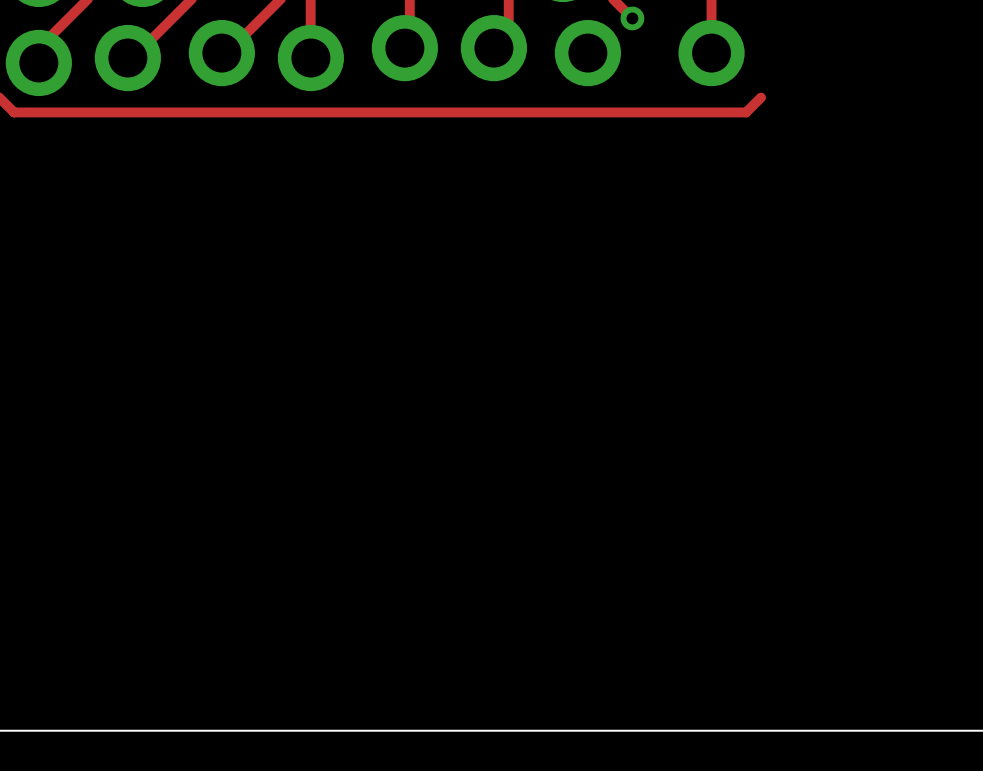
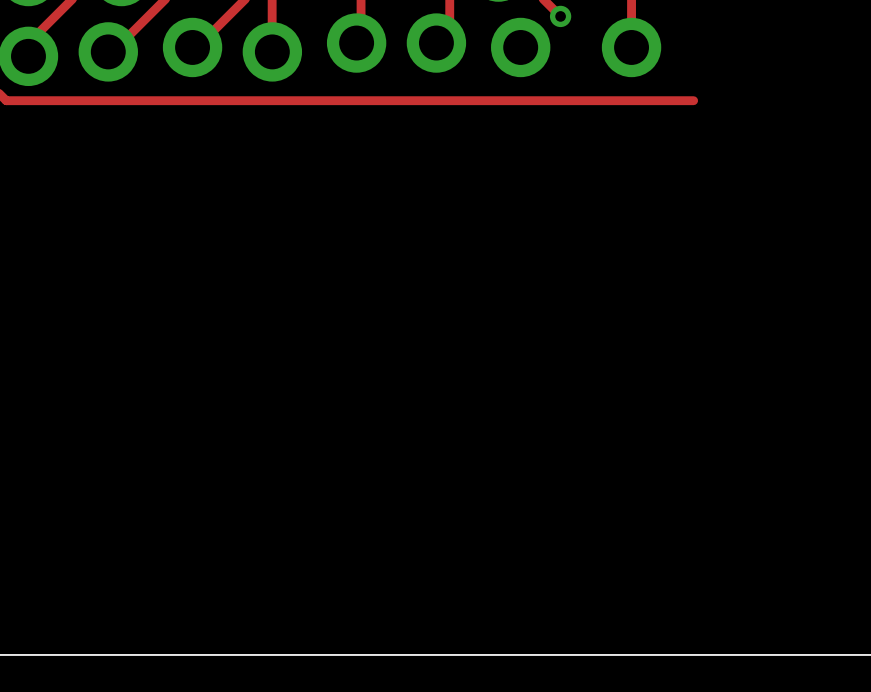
track: (761, 97) (746, 112) -> (693, 100) (662, 100)

